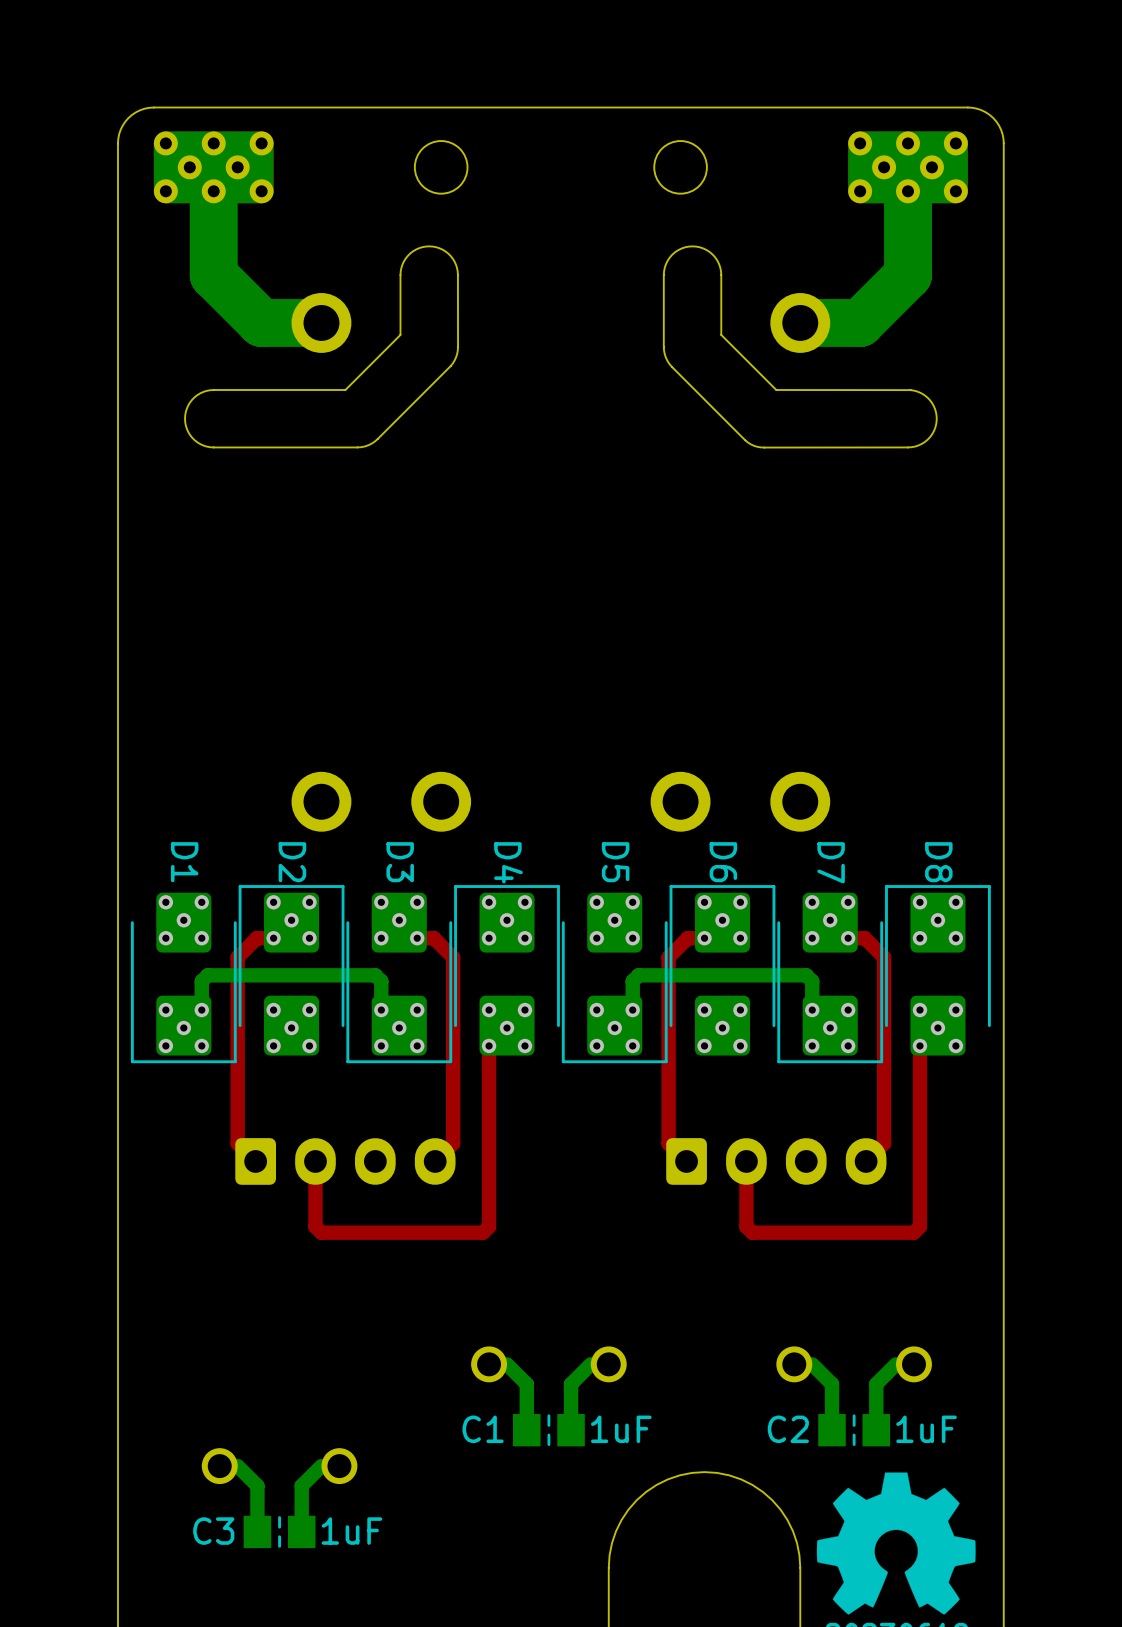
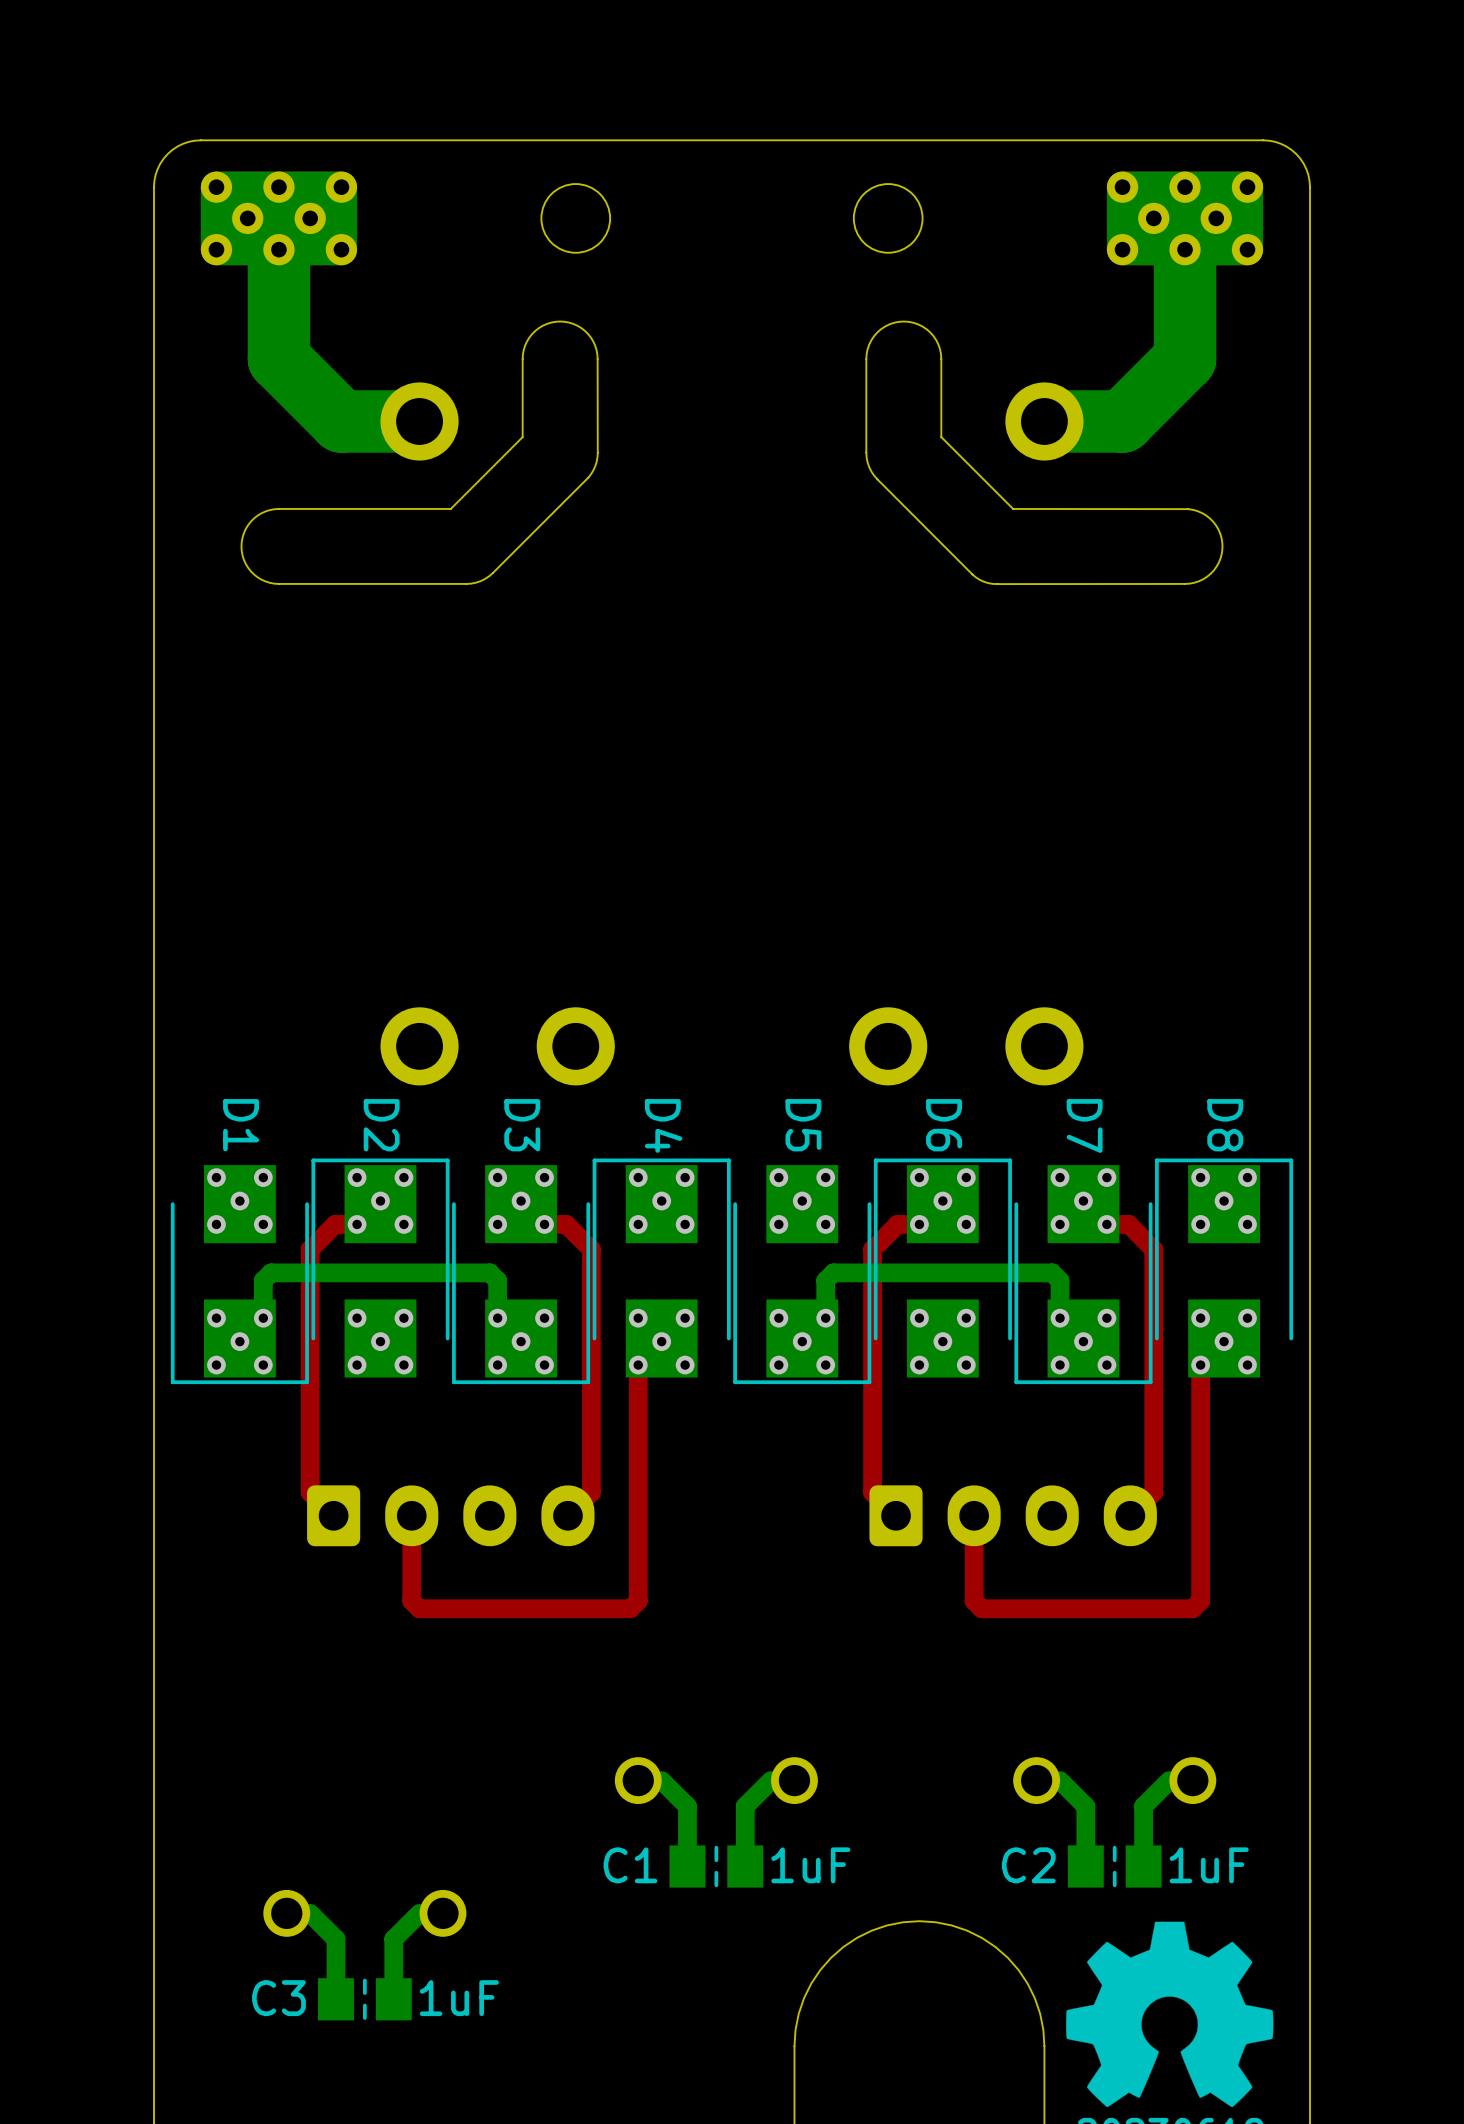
D2 footprint: [238, 885, 345, 1056] -> [311, 1158, 450, 1378]
D4 footprint: [454, 885, 560, 1056] -> [592, 1158, 731, 1378]
D6 footprint: [669, 885, 776, 1056] -> [873, 1158, 1012, 1378]
D8 footprint: [885, 885, 991, 1056] -> [1155, 1158, 1294, 1378]
D1 footprint: [130, 892, 237, 1064] -> [170, 1165, 309, 1385]
D3 footprint: [346, 892, 453, 1064] -> [452, 1165, 591, 1385]
D5 footprint: [561, 892, 668, 1064] -> [733, 1165, 872, 1385]
D7 footprint: [777, 892, 884, 1064] -> [1014, 1165, 1153, 1385]

